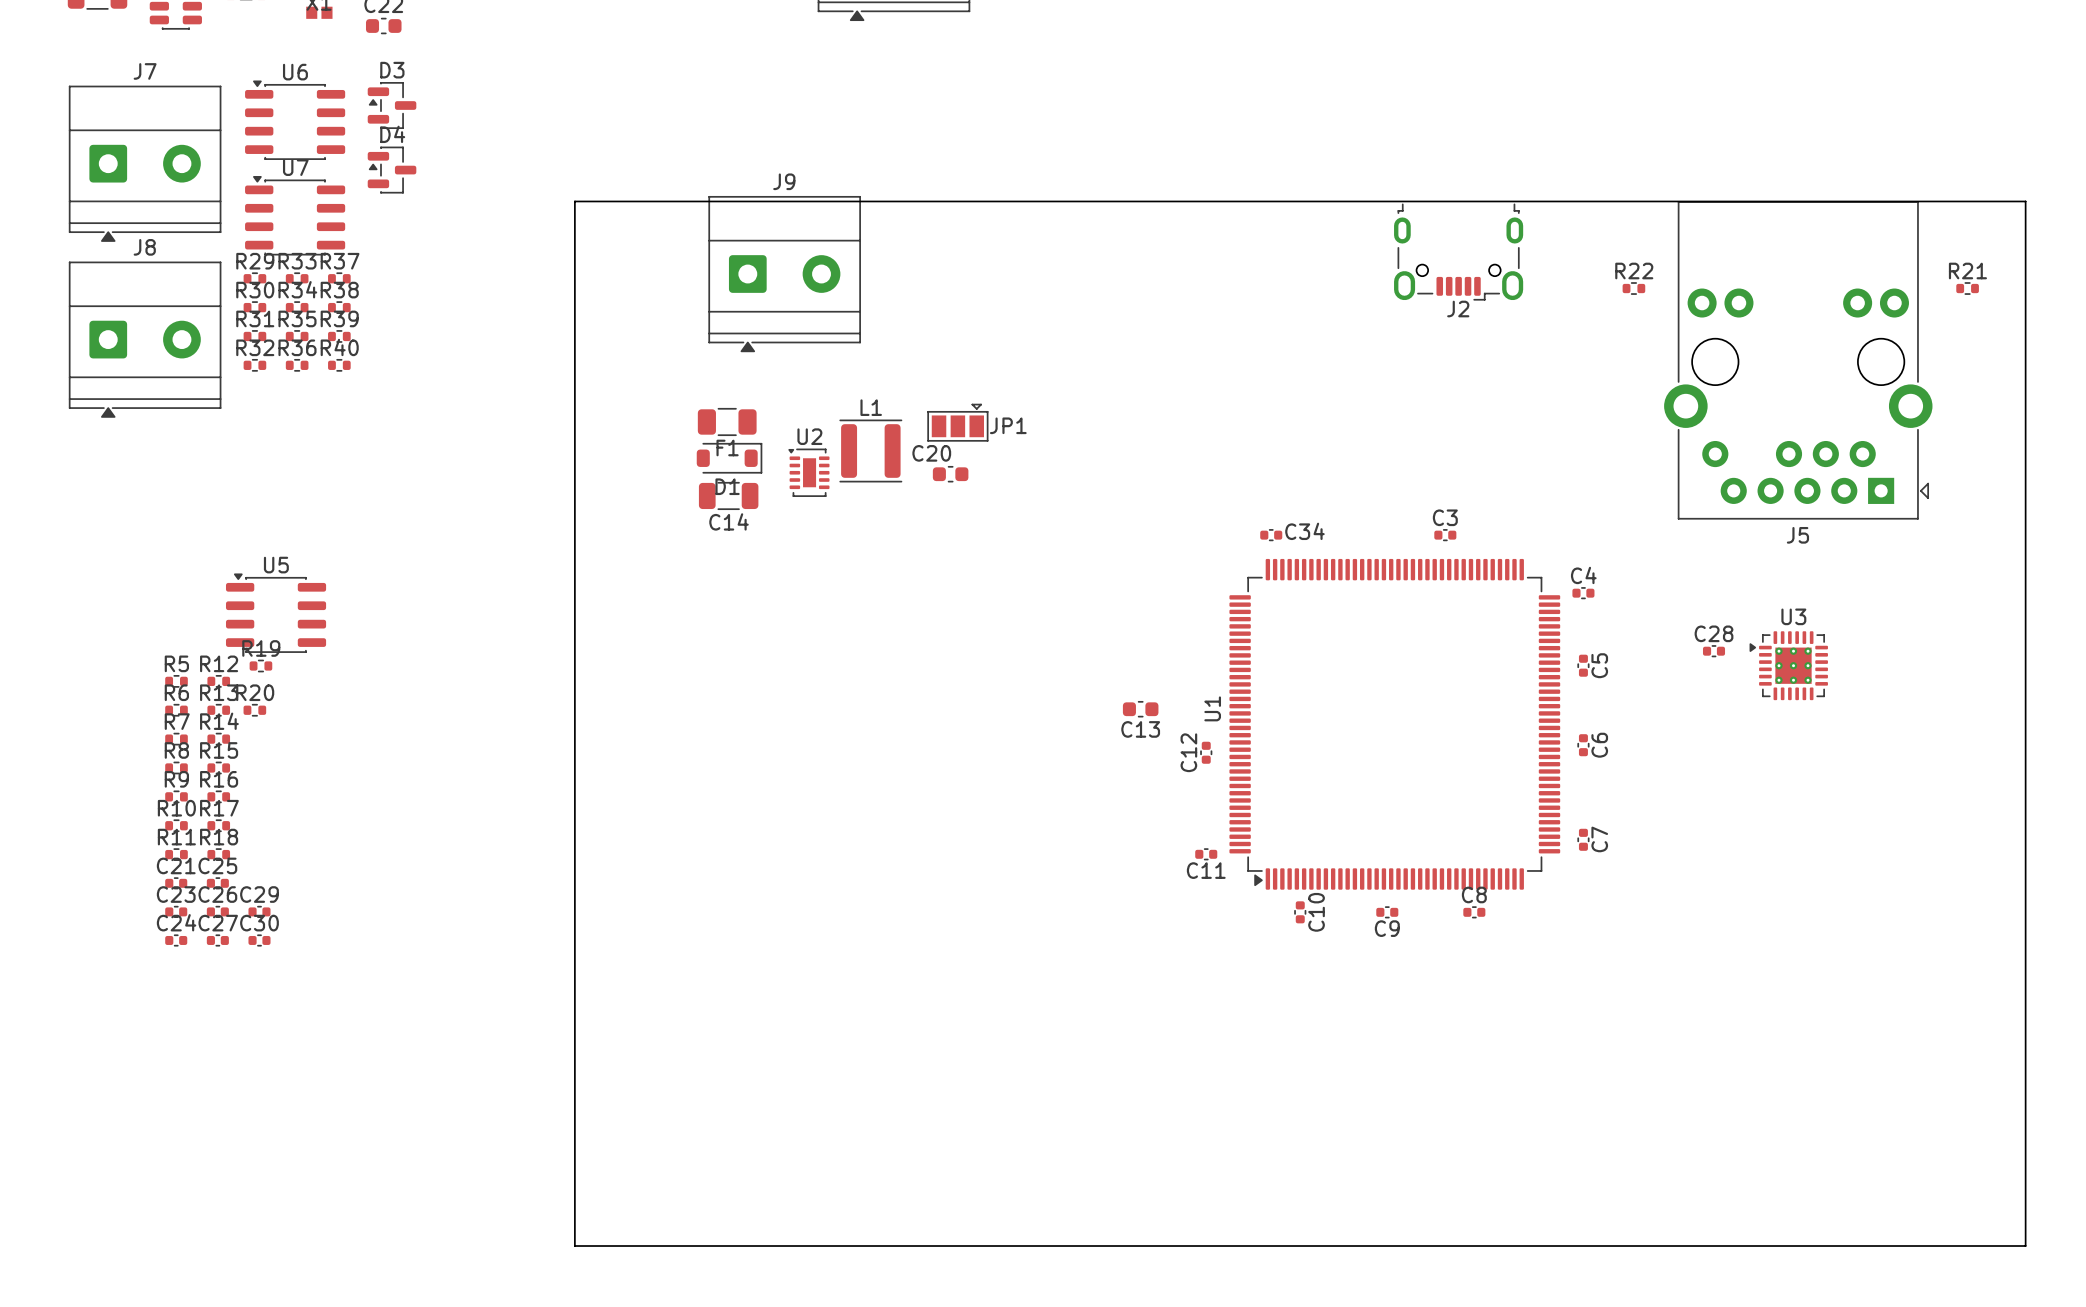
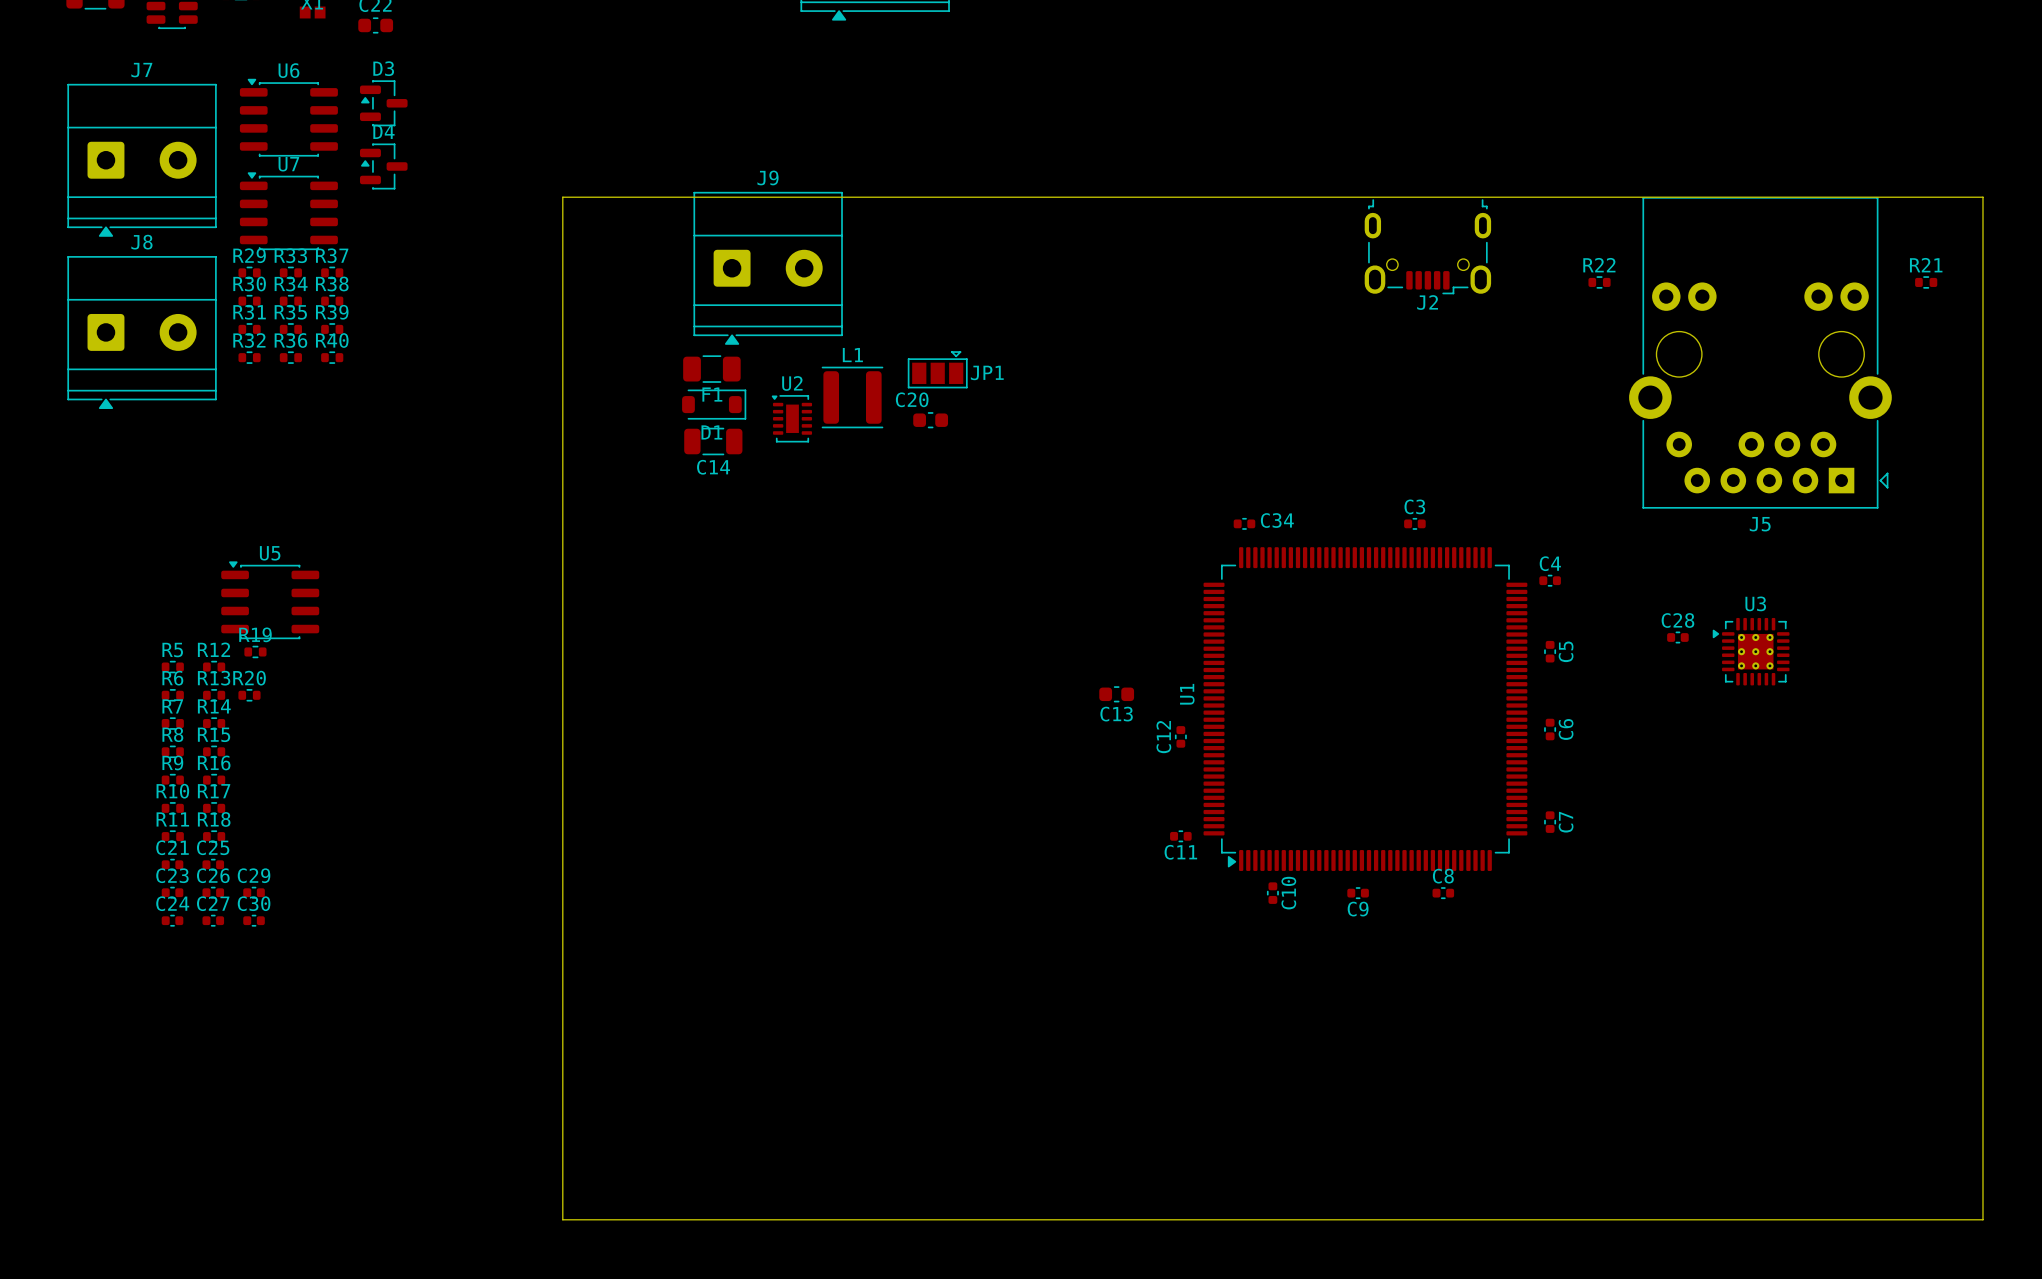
F1 position: (727, 421) -> (711, 369)
JP1 position: (957, 422) -> (937, 369)
L1 position: (870, 451) -> (852, 397)
D1 position: (729, 458) -> (714, 404)
U2 position: (808, 472) -> (791, 418)
C20 position: (950, 474) -> (930, 420)
C14 position: (728, 495) -> (713, 441)

